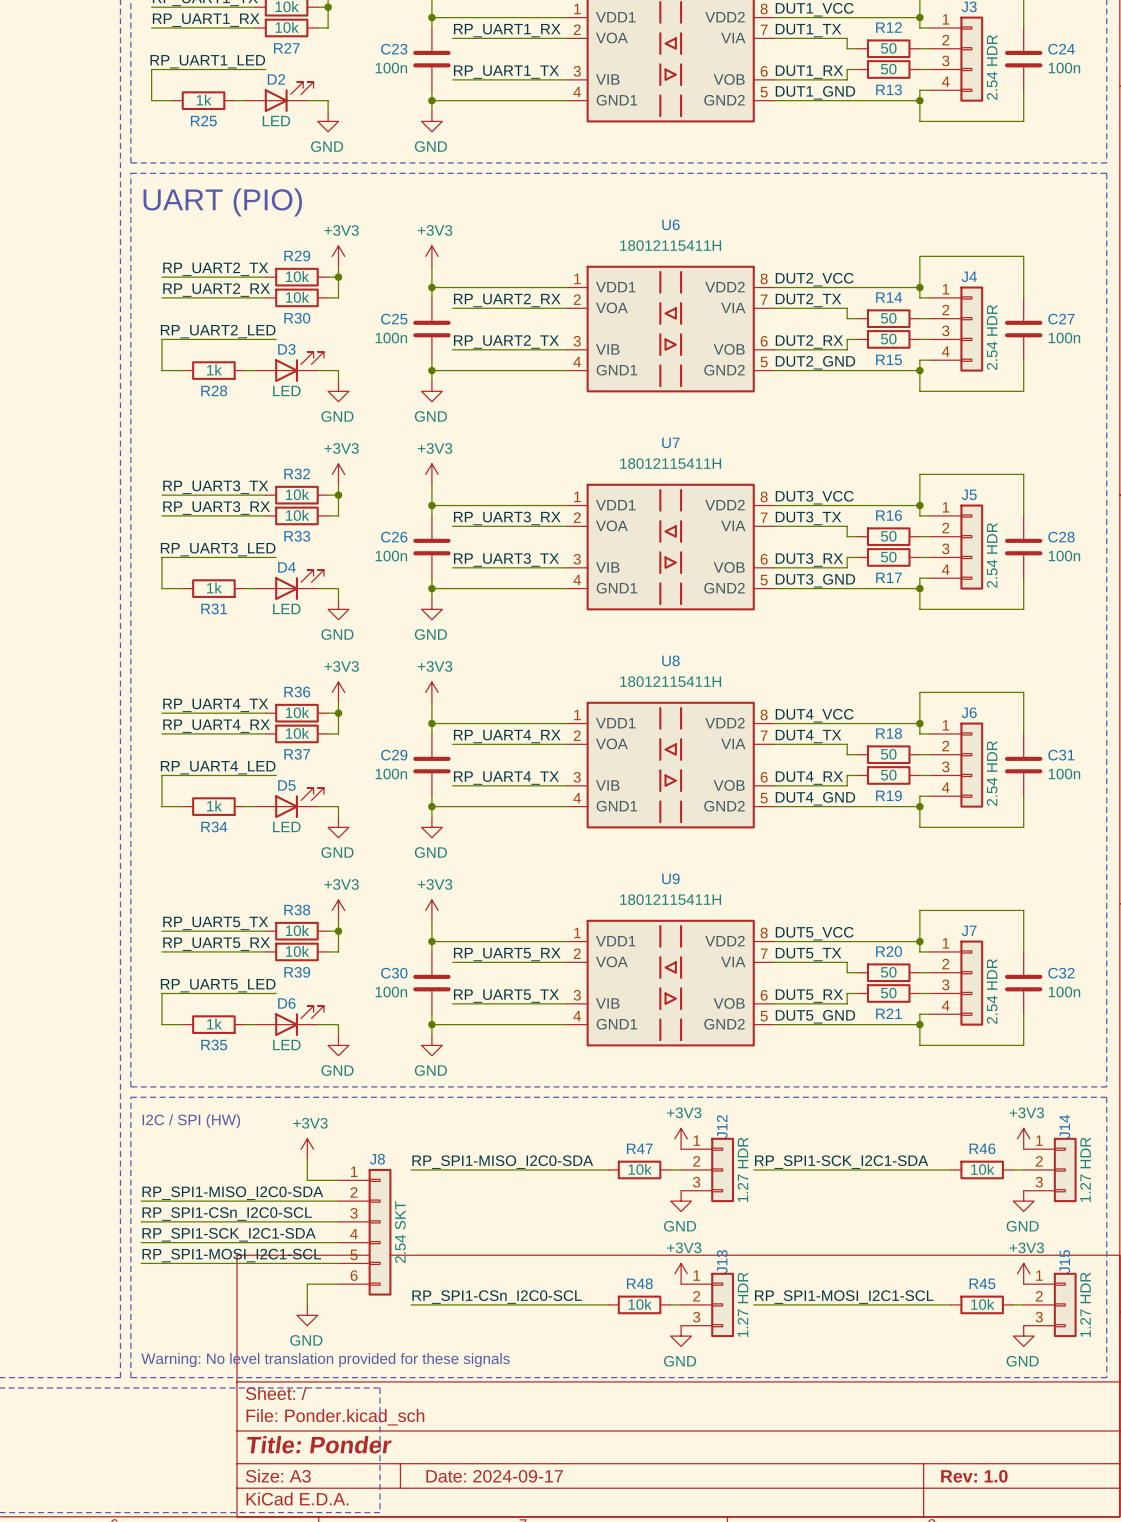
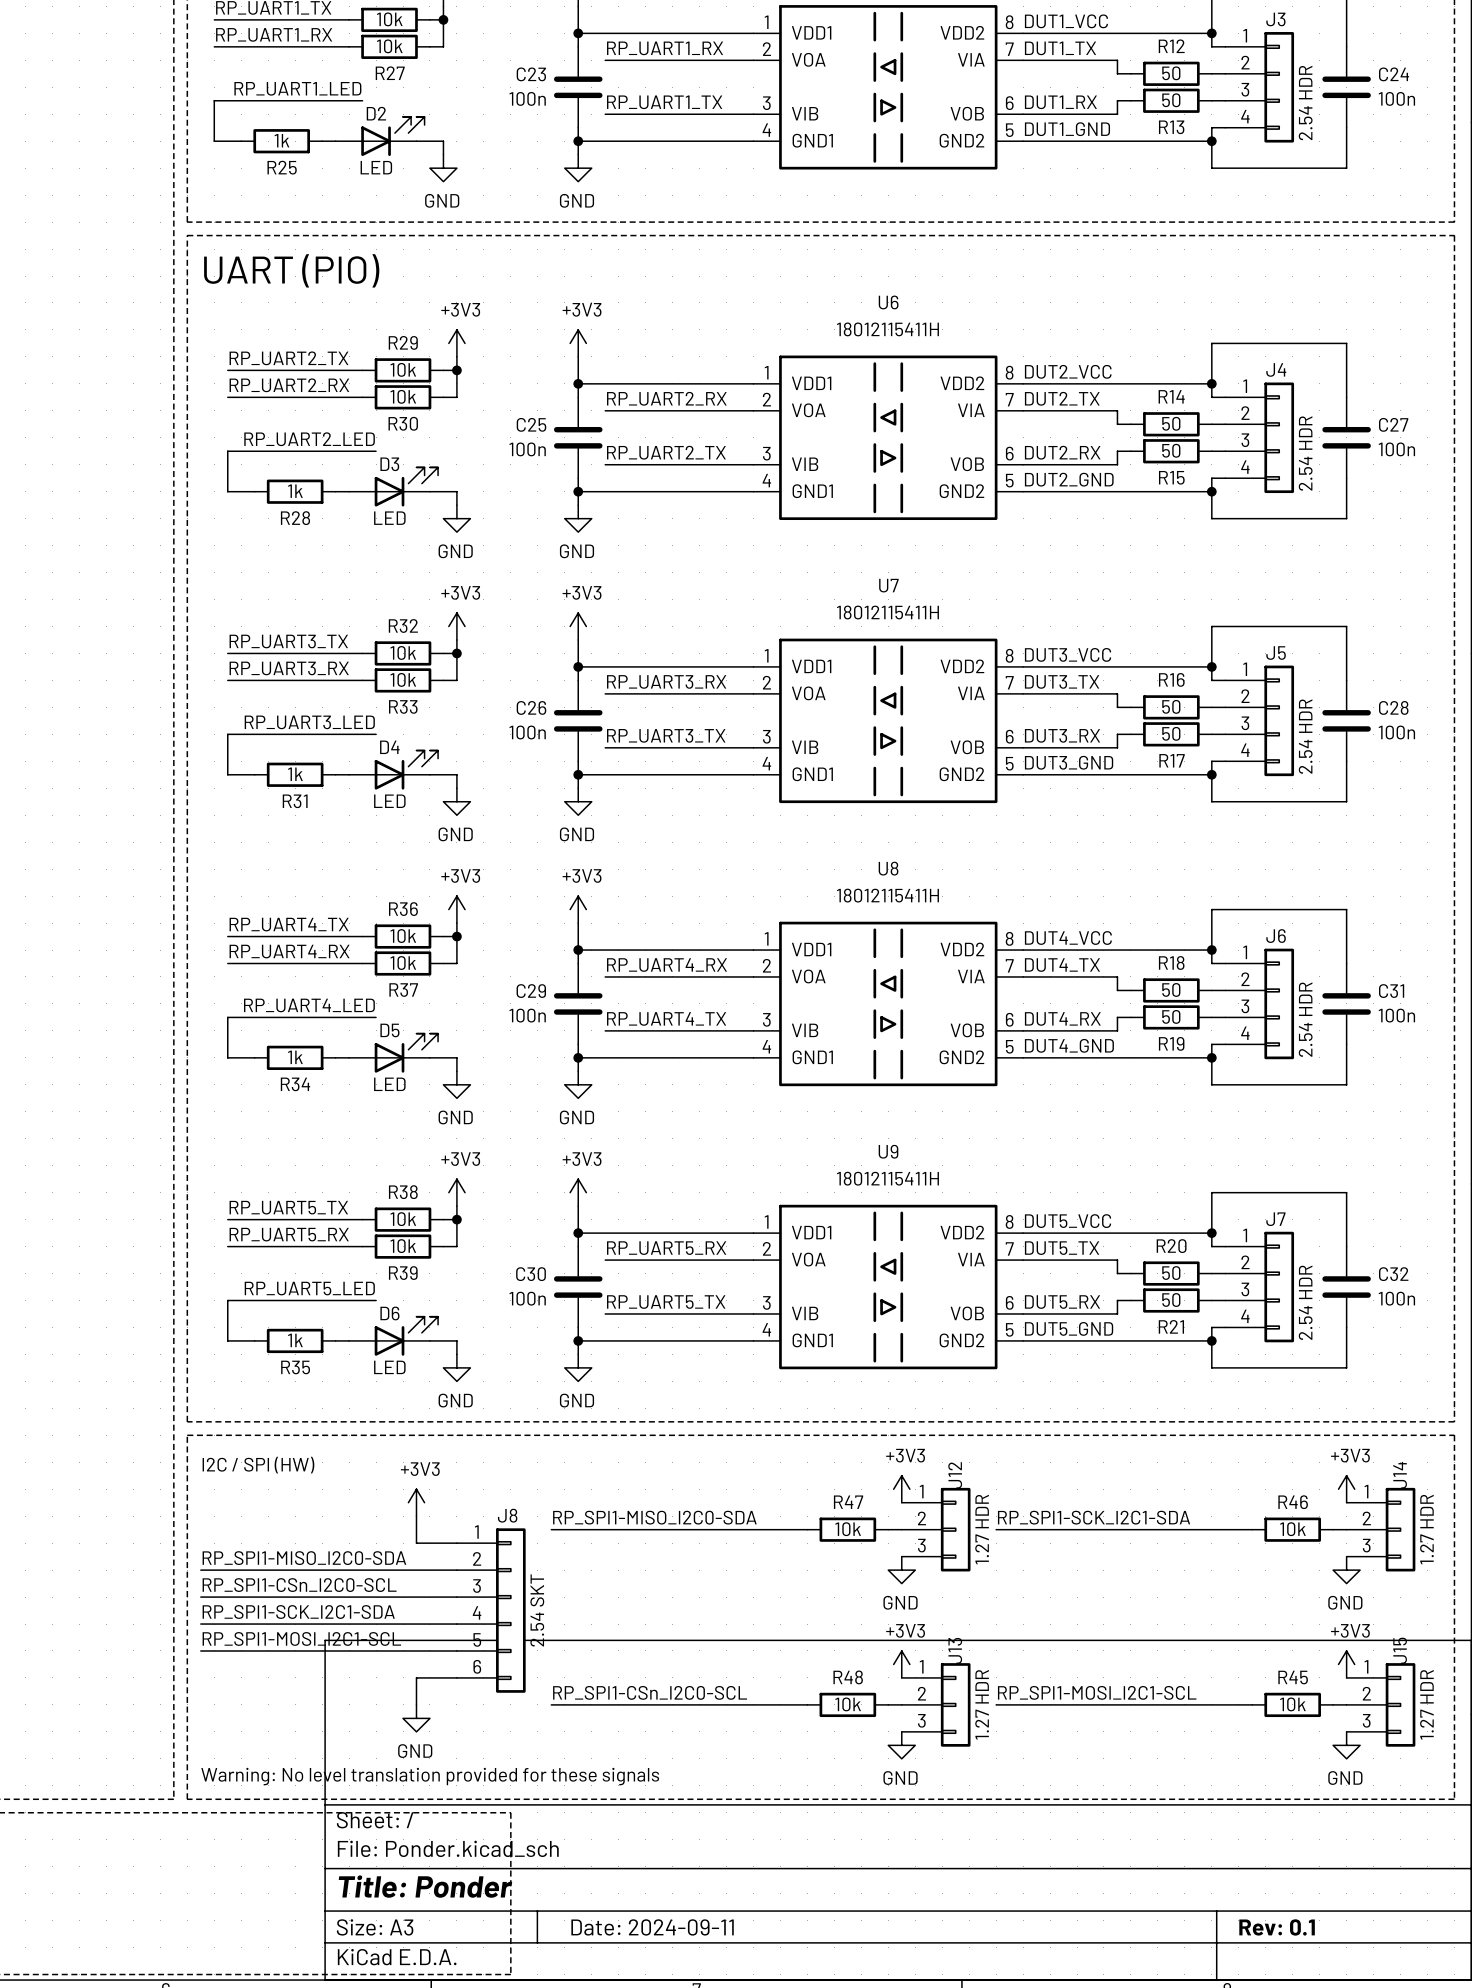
title block: Date: 2024-09-17 (494, 1476) -> Date: 2024-09-11 (652, 1927)
title block: Rev: 1.0 (974, 1476) -> Rev: 0.1 (1277, 1927)

